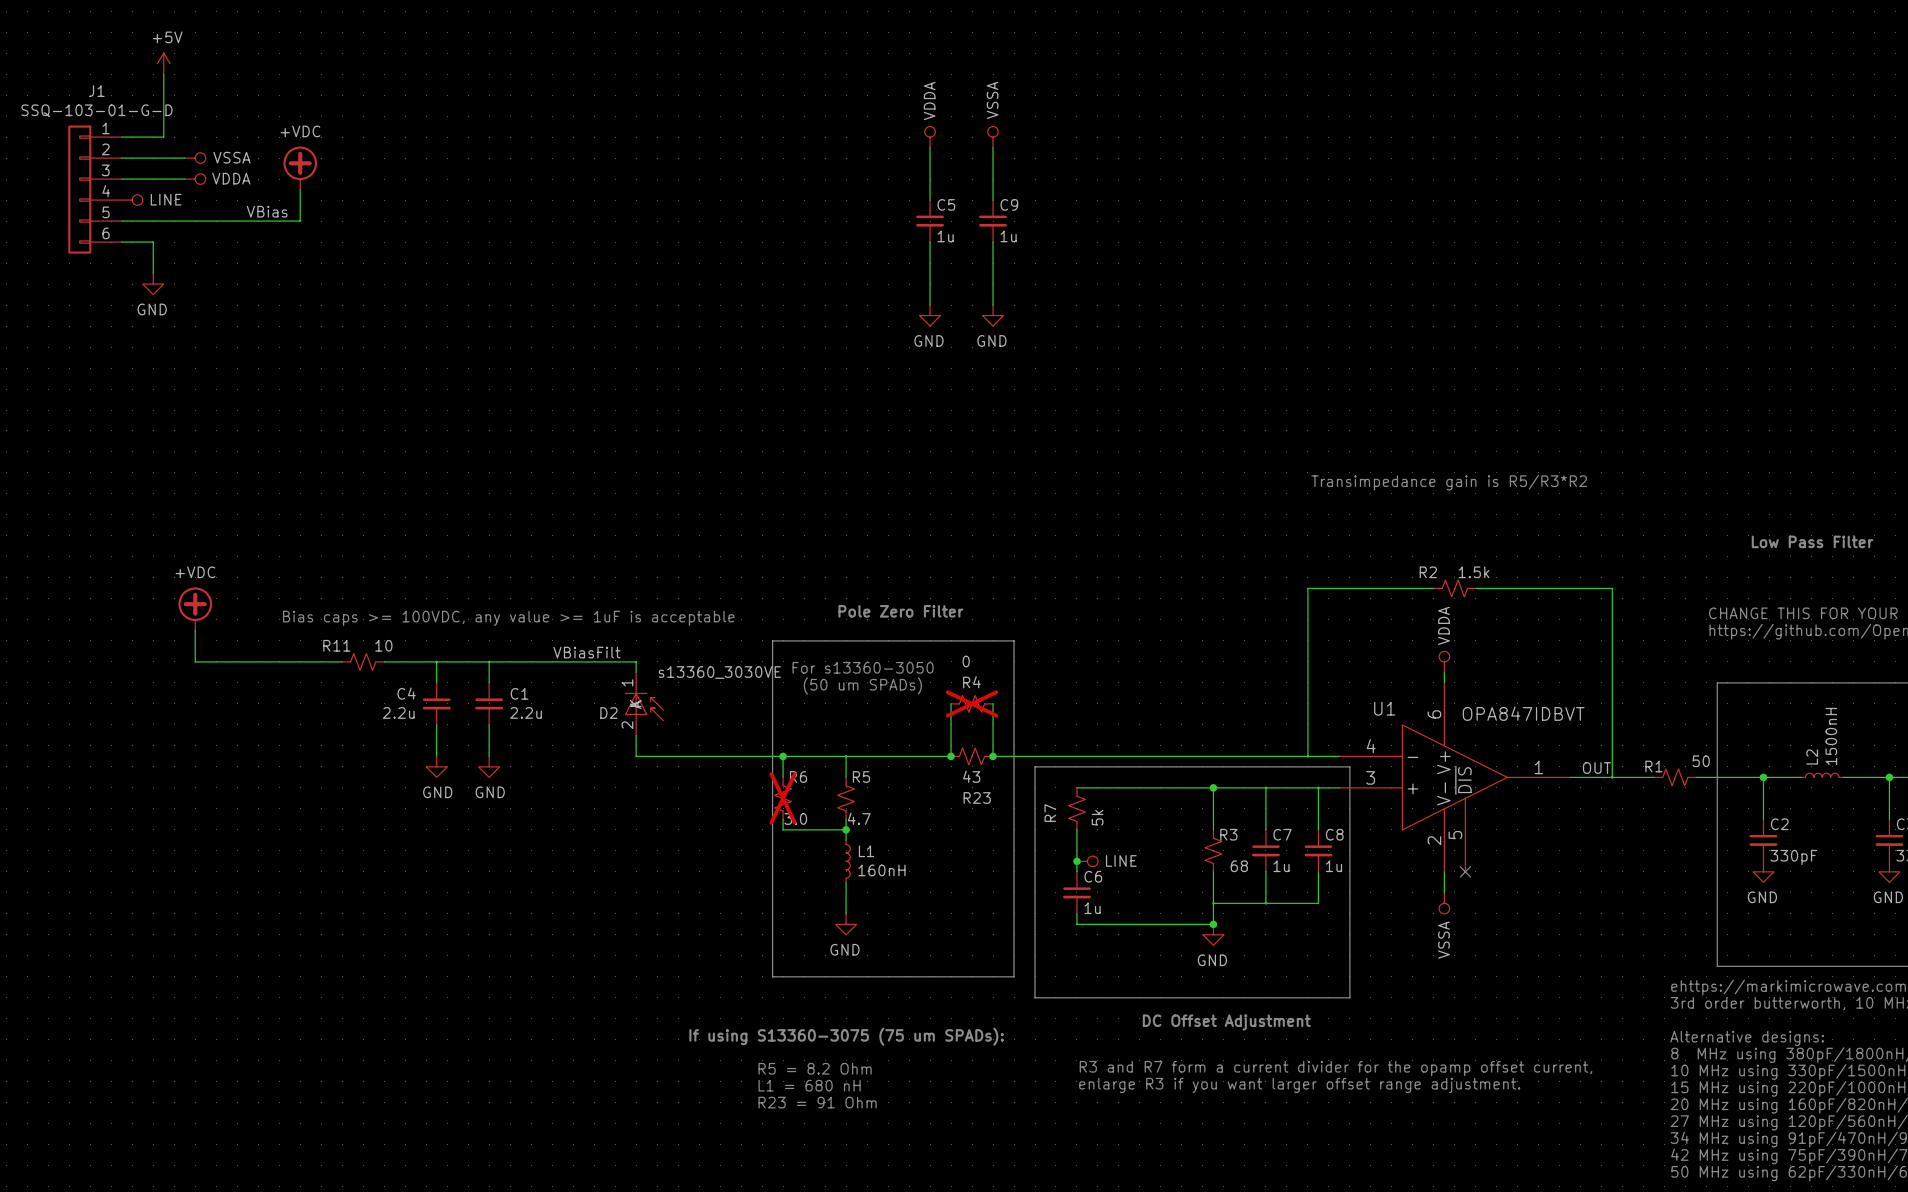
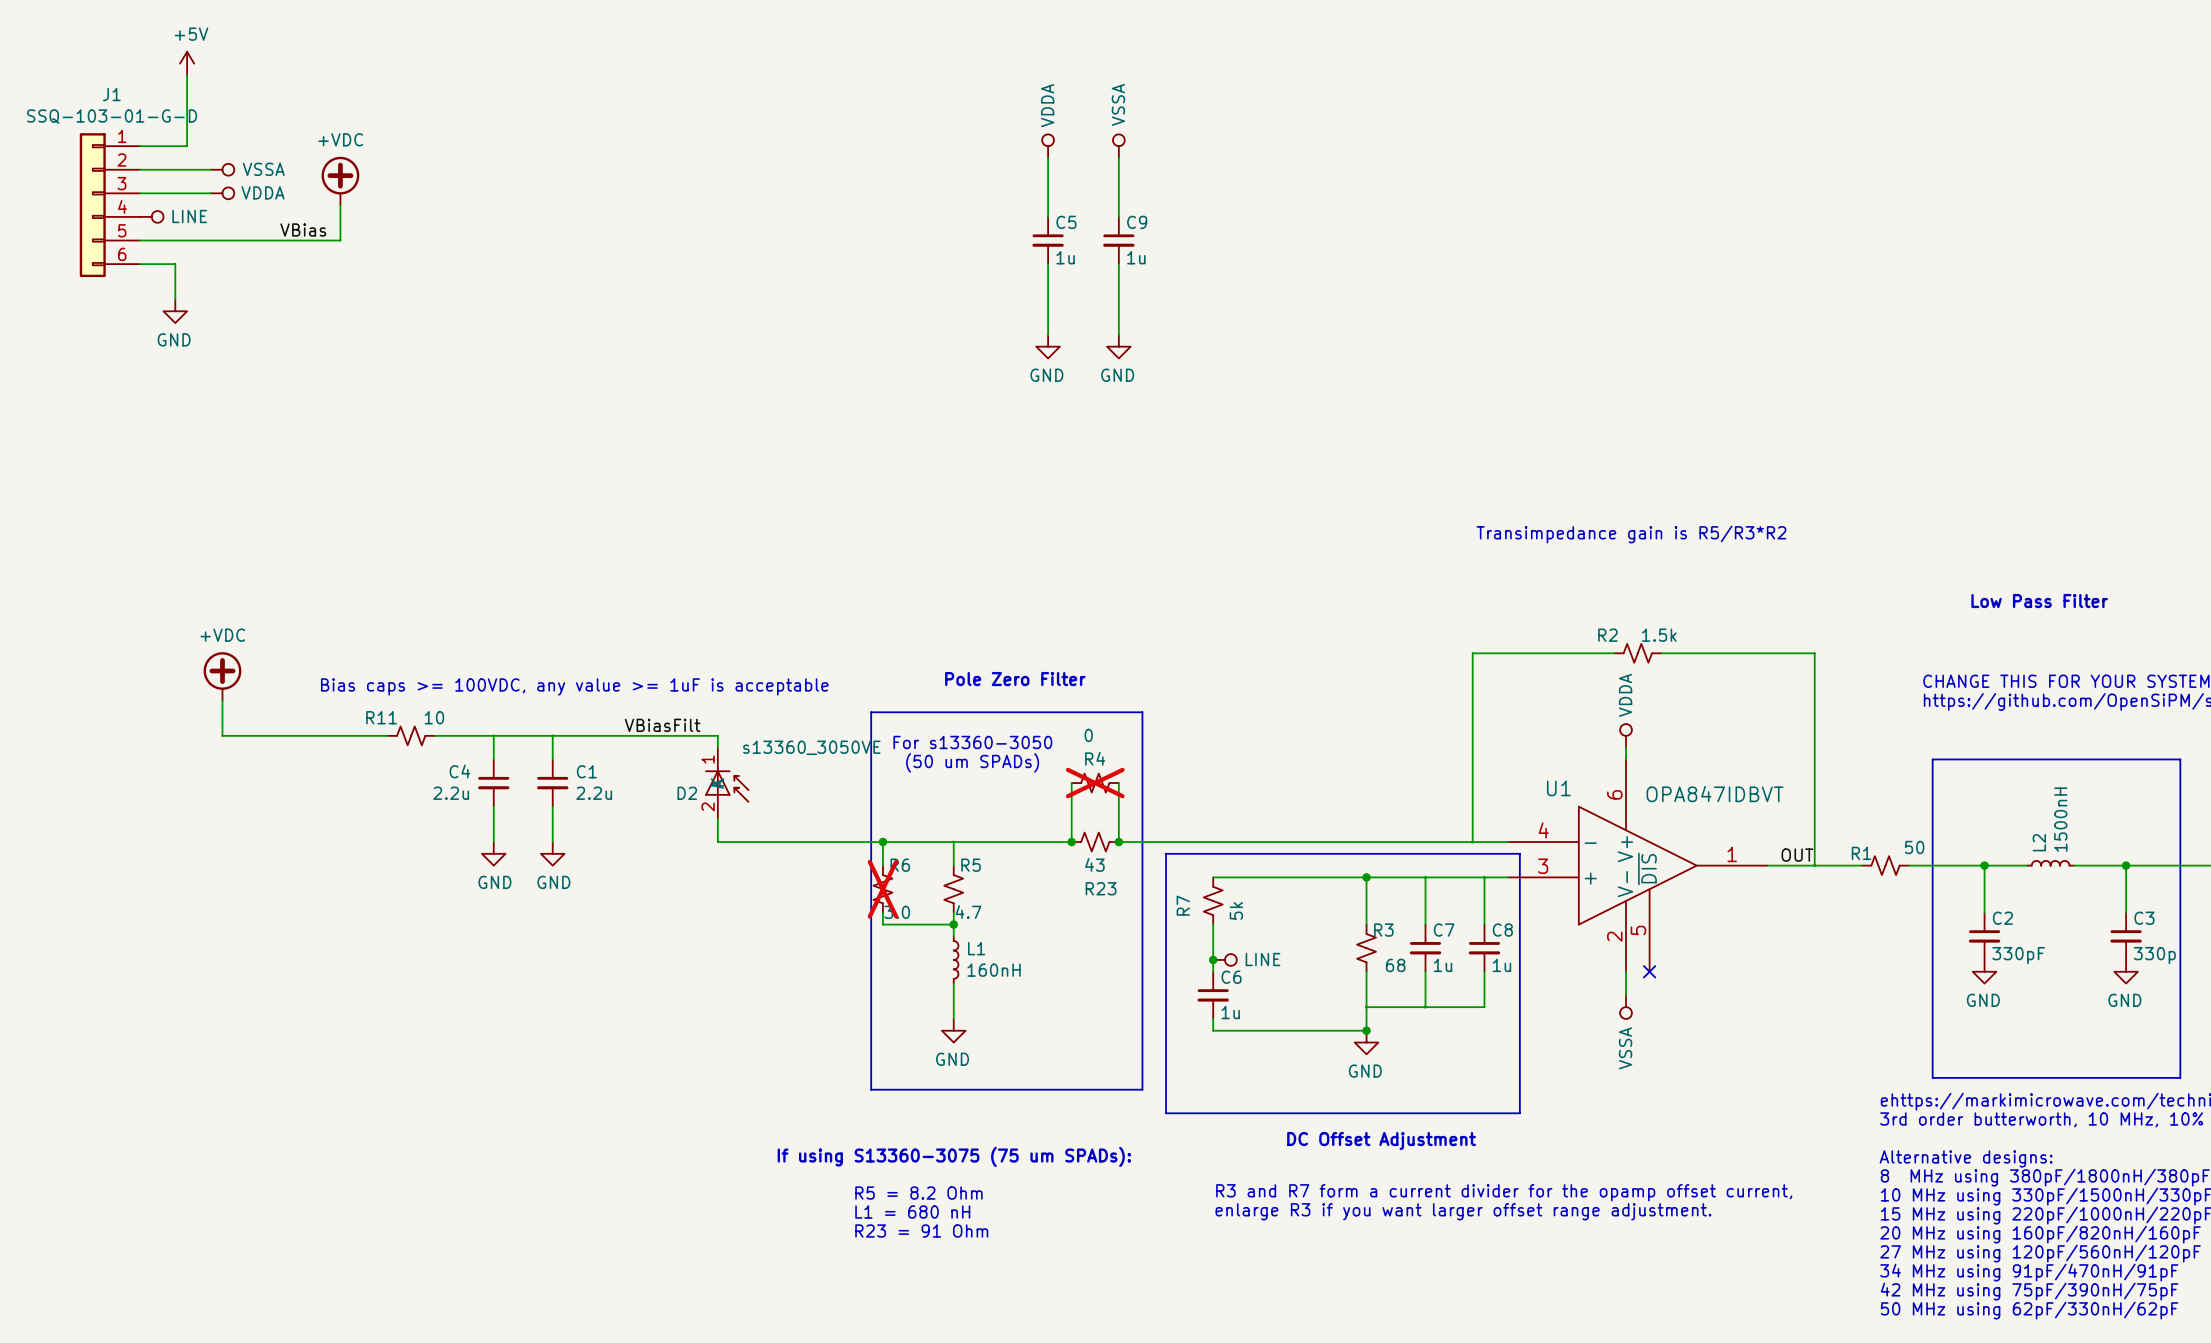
D2 value: s13360_3030VE (719, 672) -> s13360_3050VE (811, 747)

